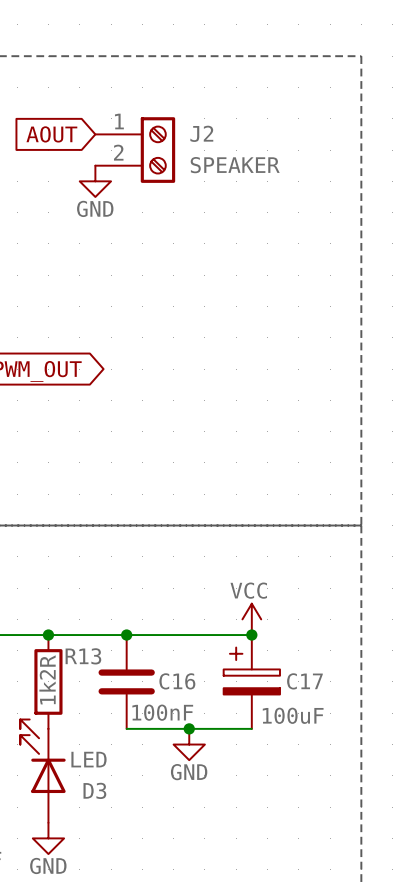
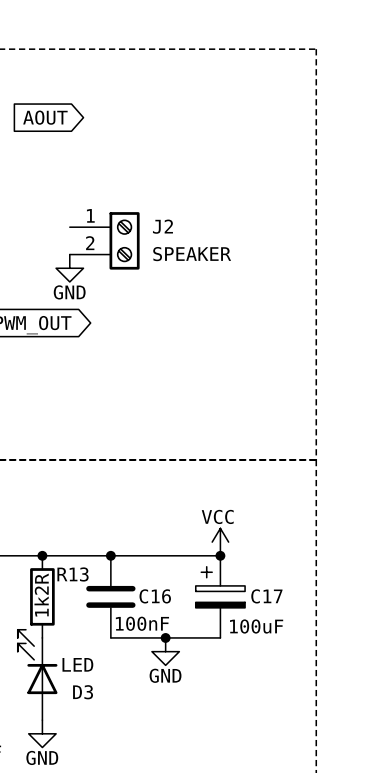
J2 position: (135, 150) -> (104, 240)
power symbol: GND (95, 181) -> none
power symbol: none -> GND (69, 268)

